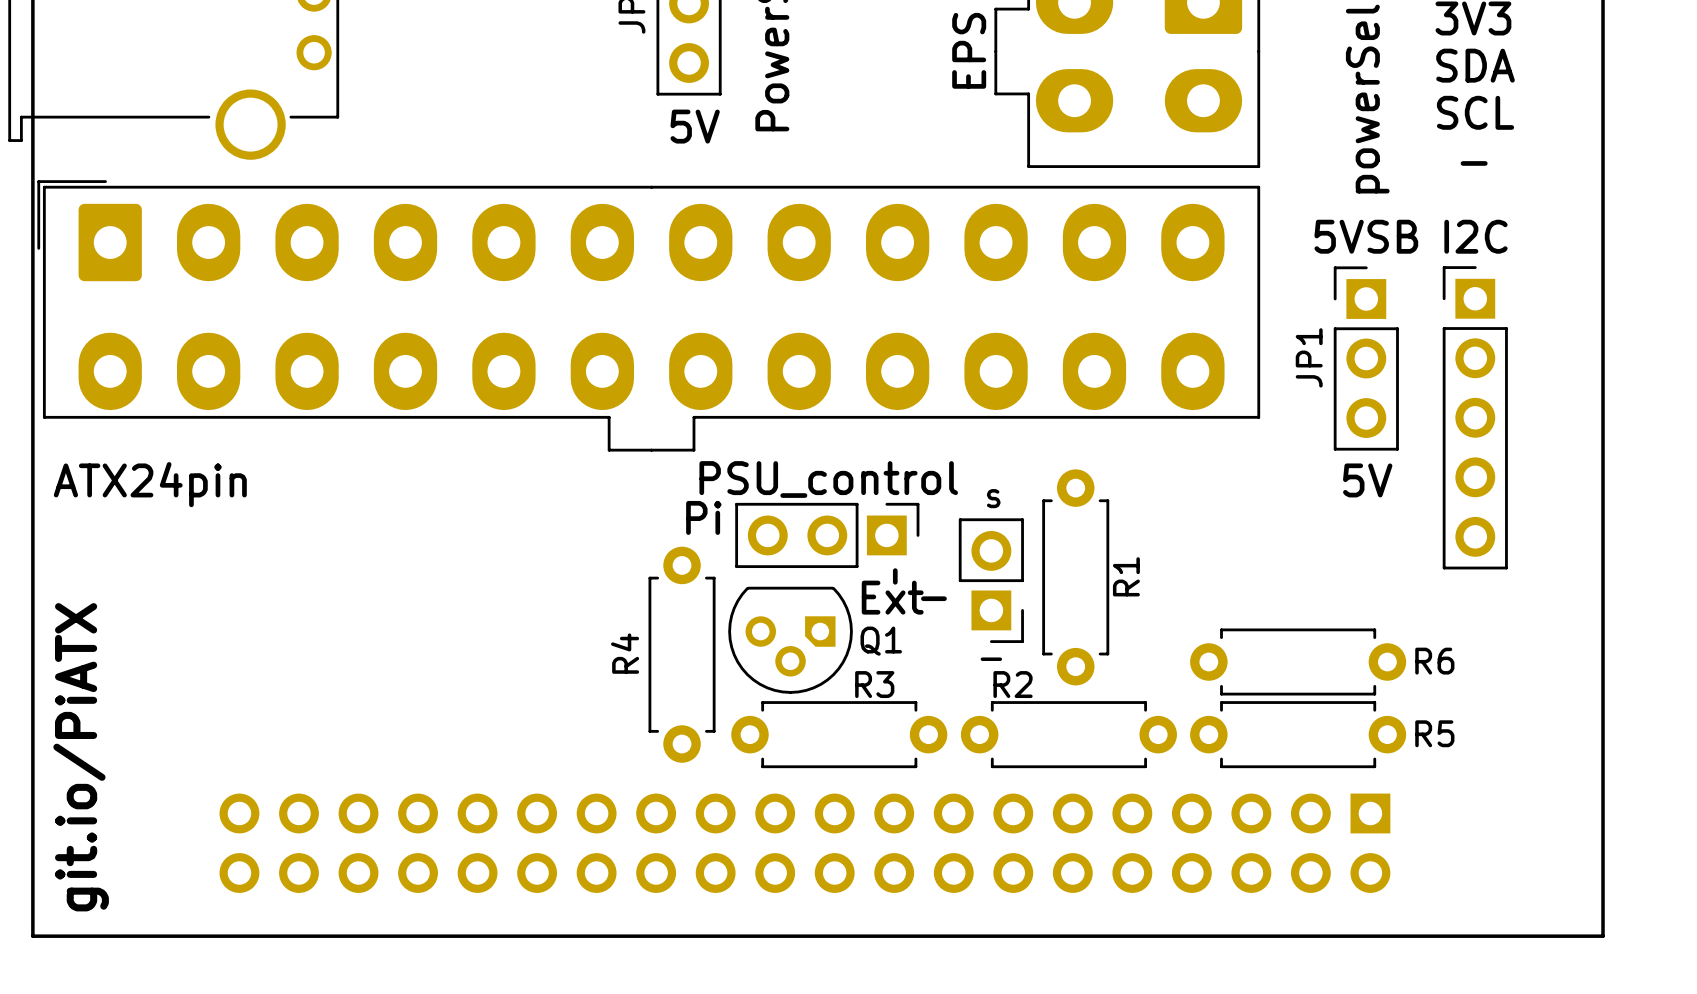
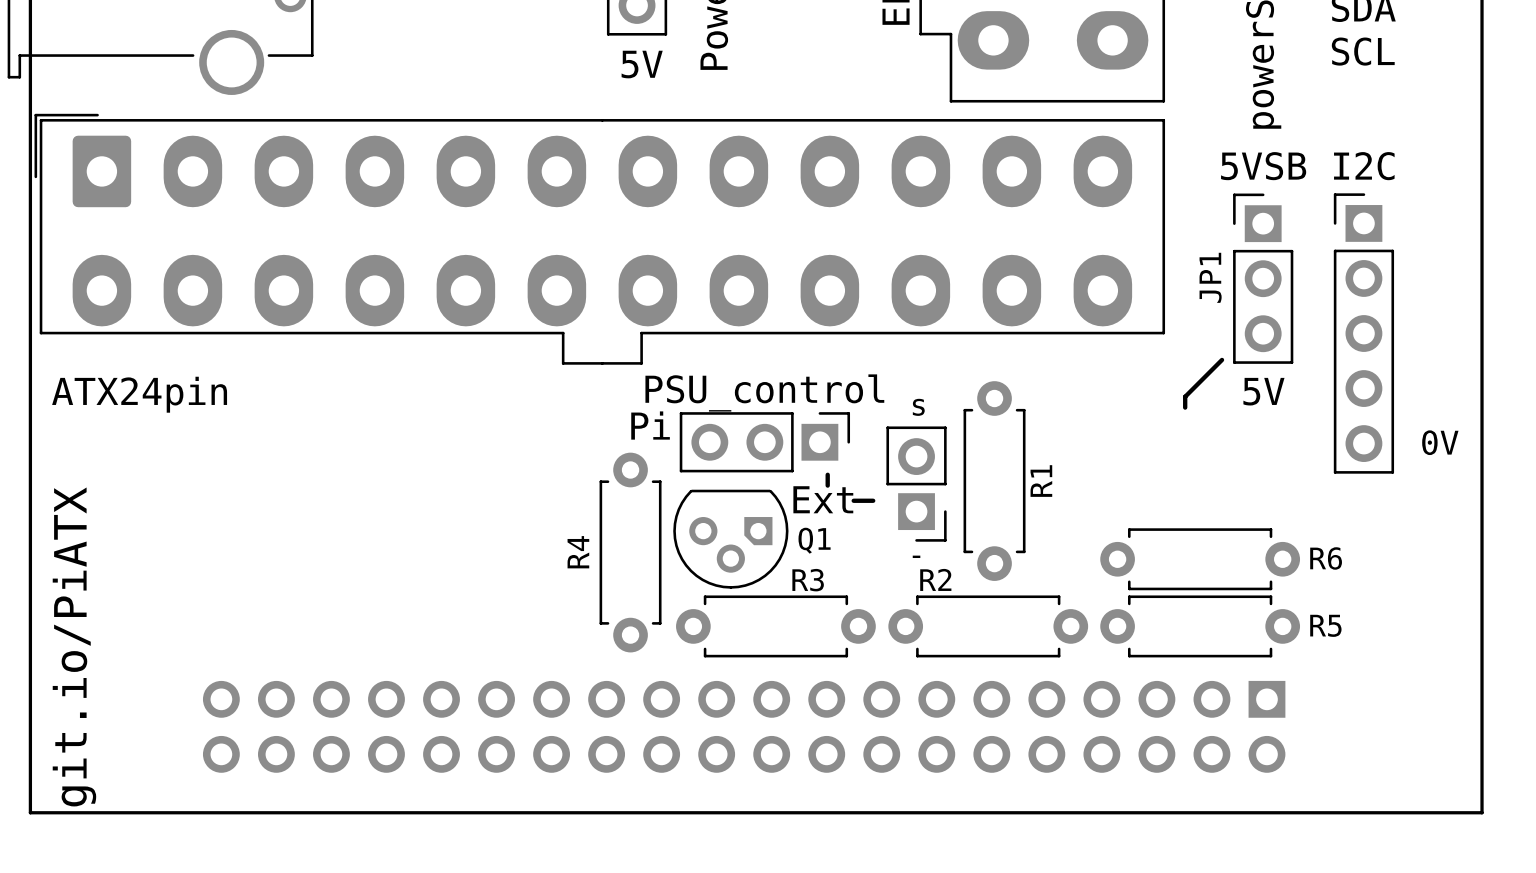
text: - (1474, 163) -> none
line: none -> (1222, 359) (1185, 396) (1185, 407)
text: none -> 0V (1440, 442)

